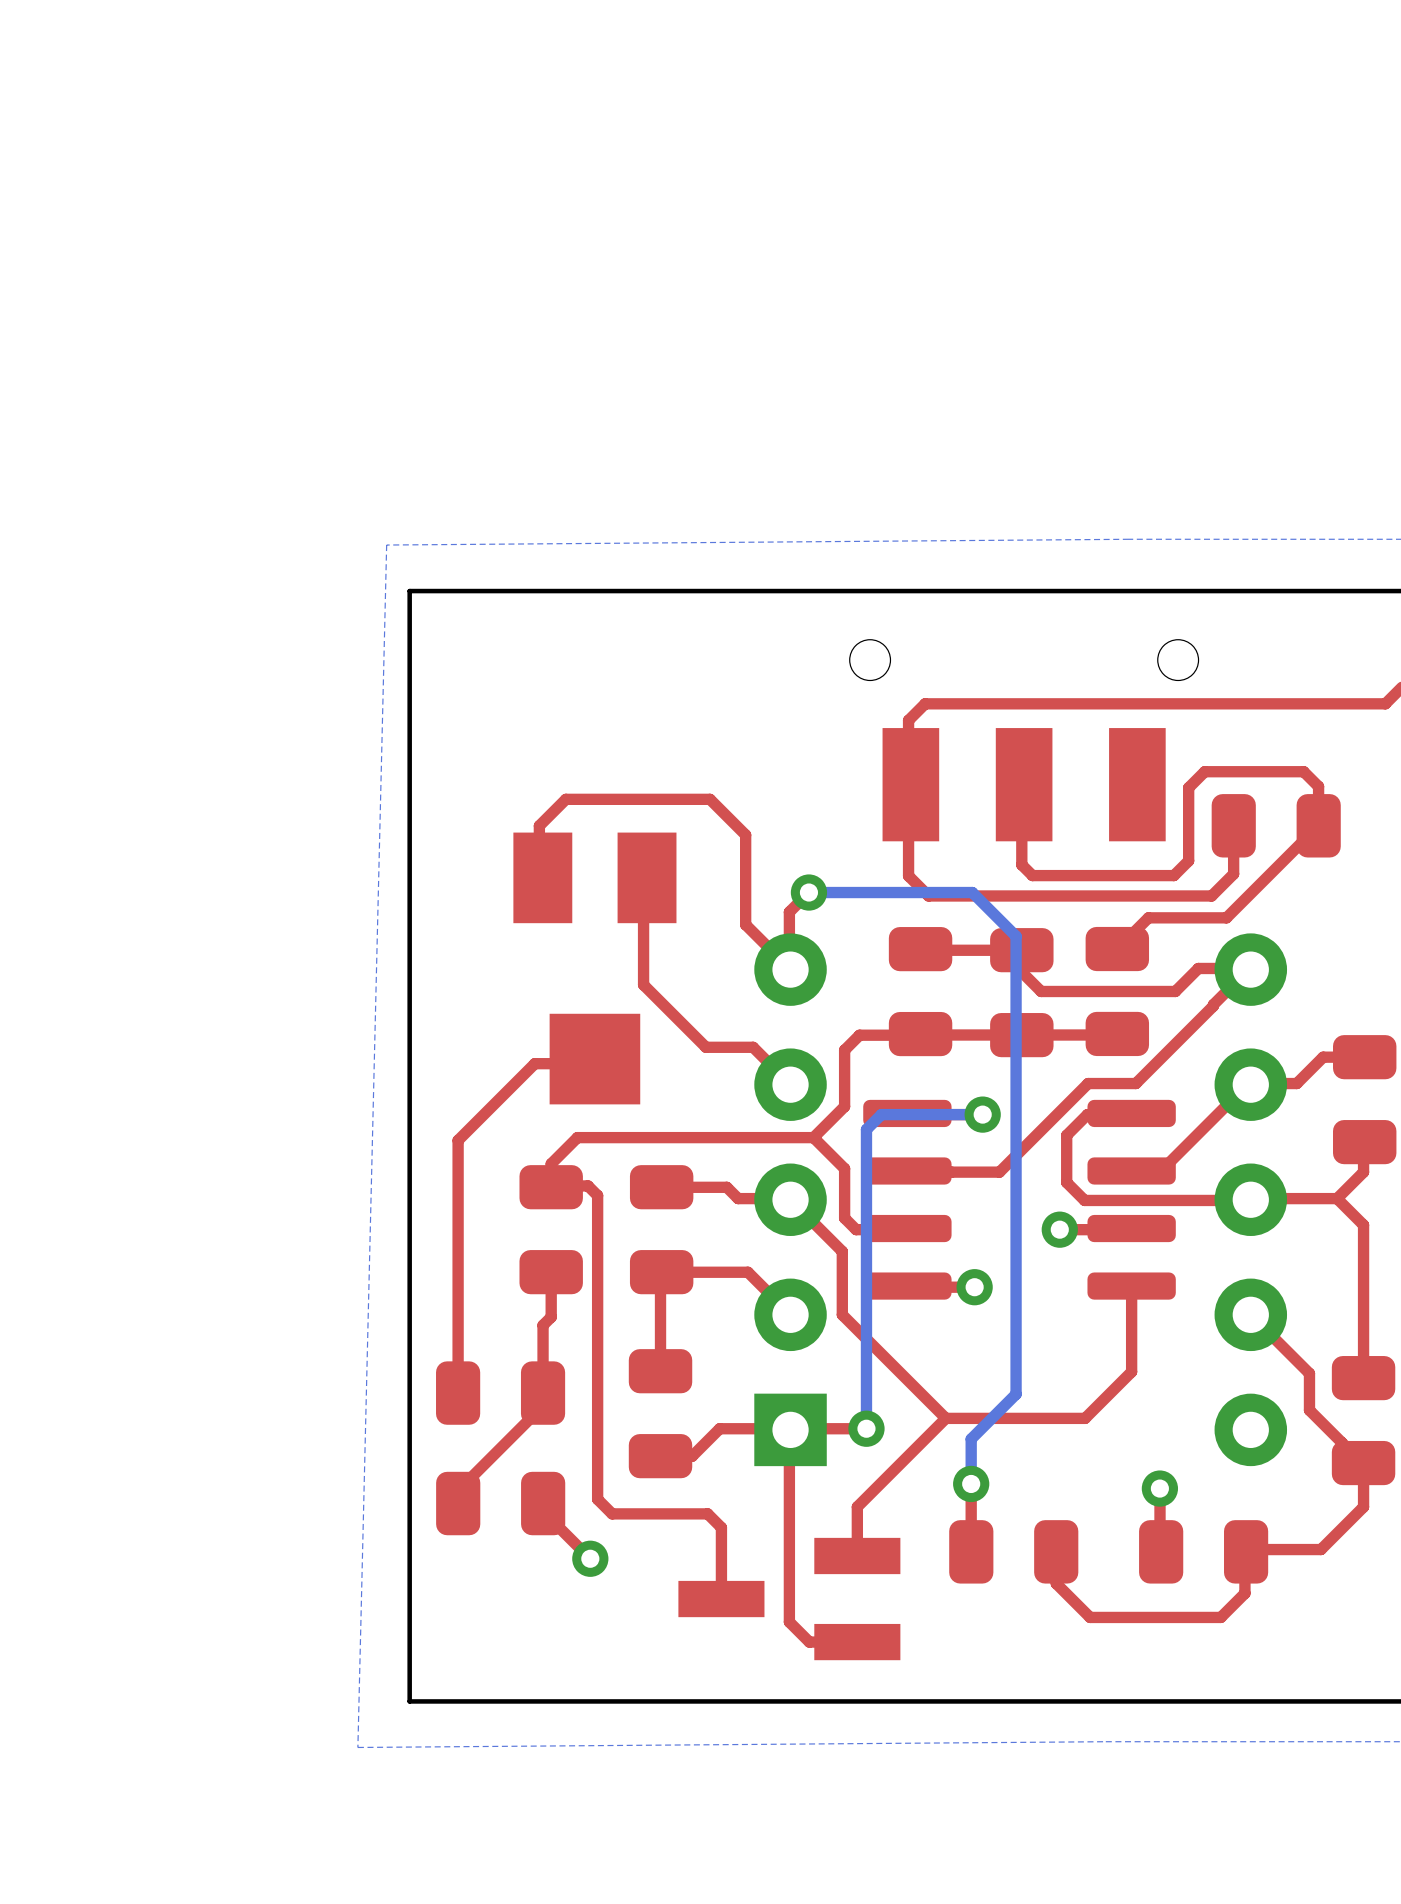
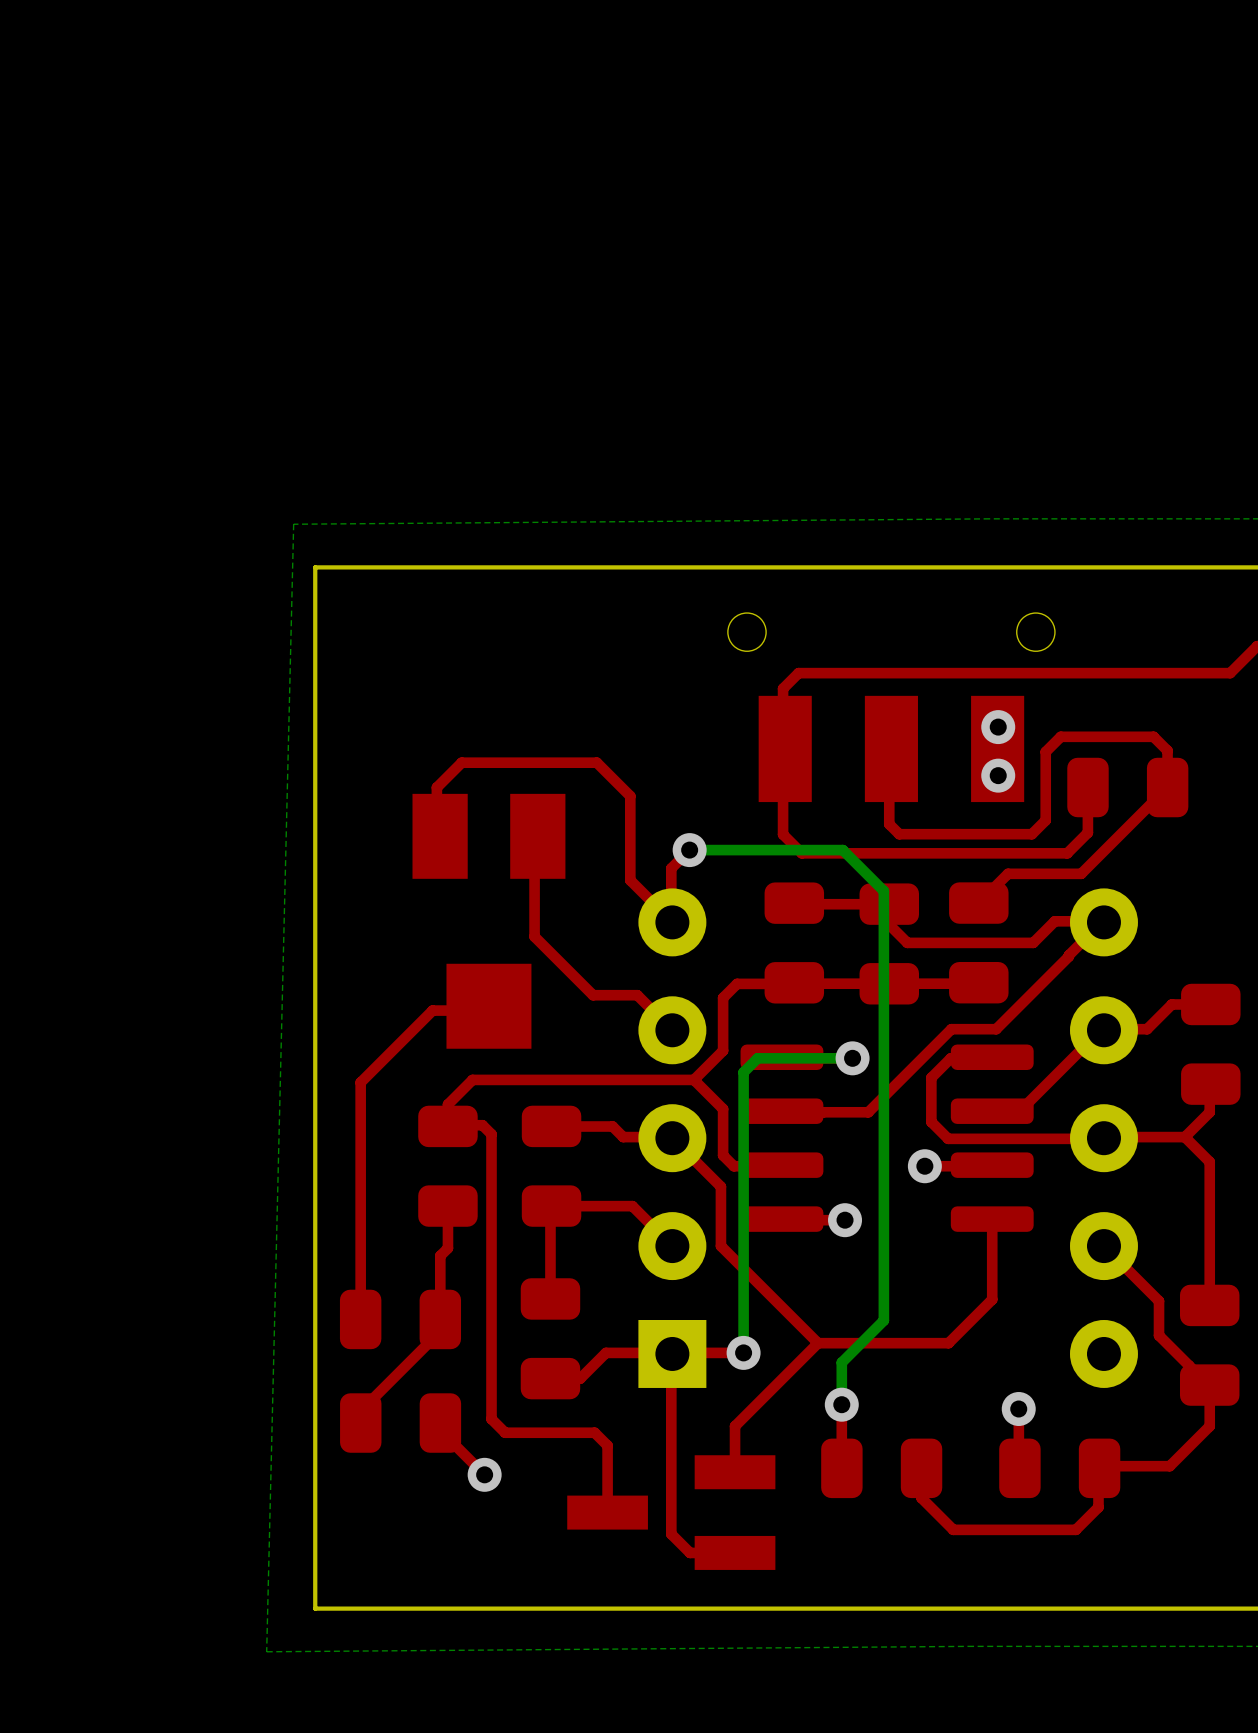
via: none -> (998, 727)
via: none -> (998, 775)

